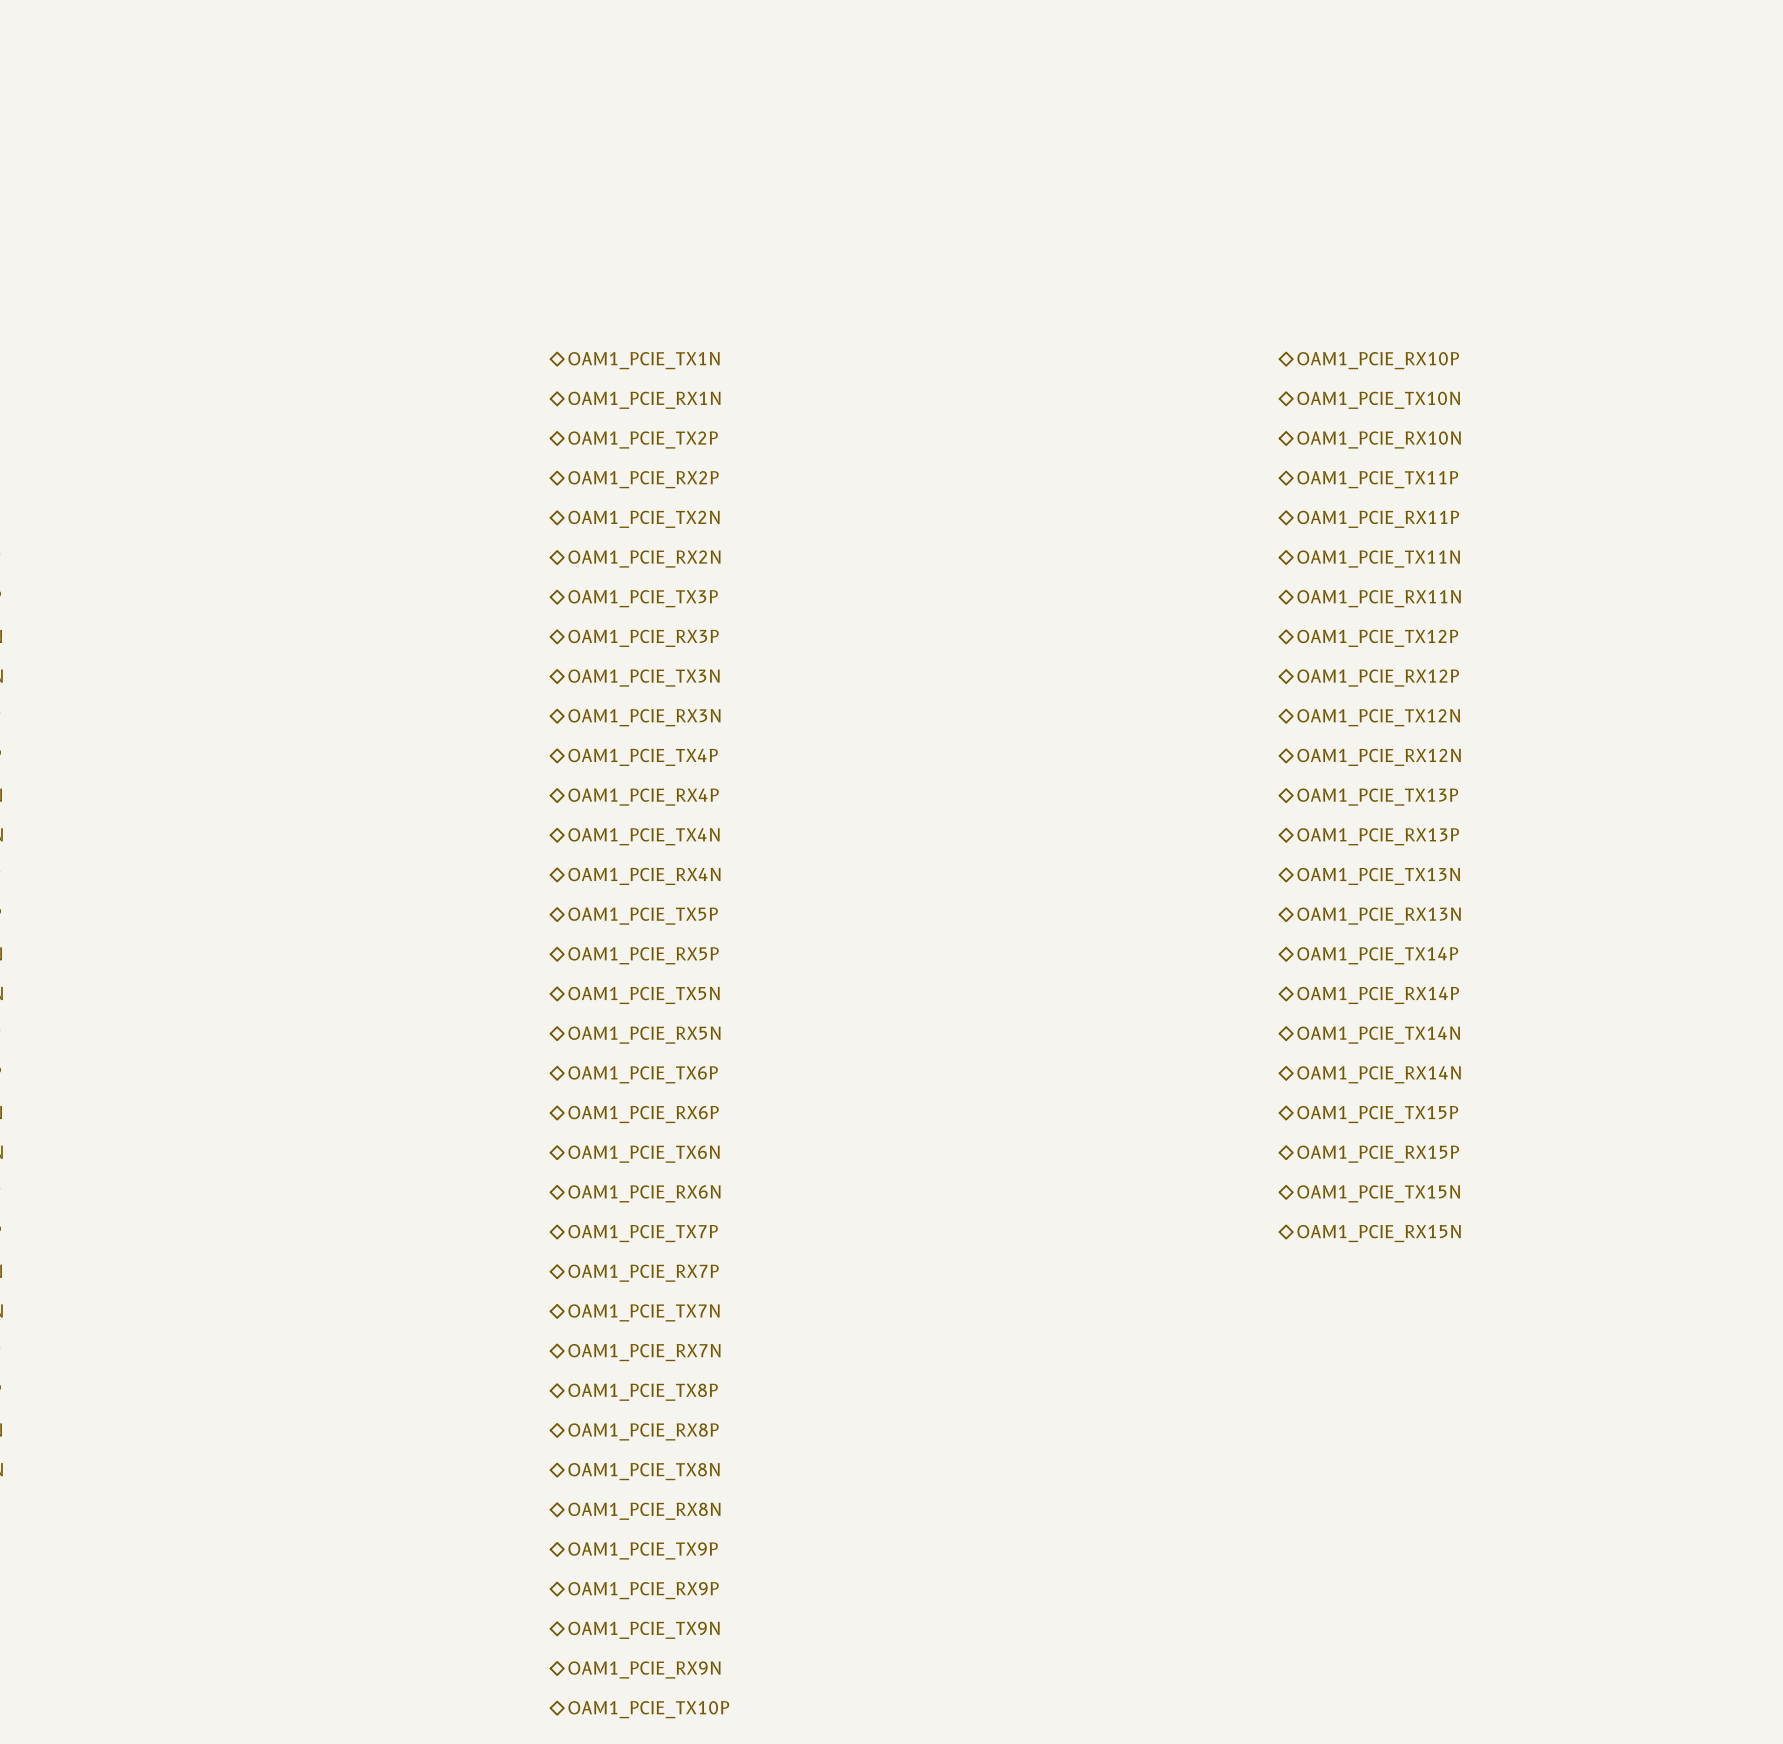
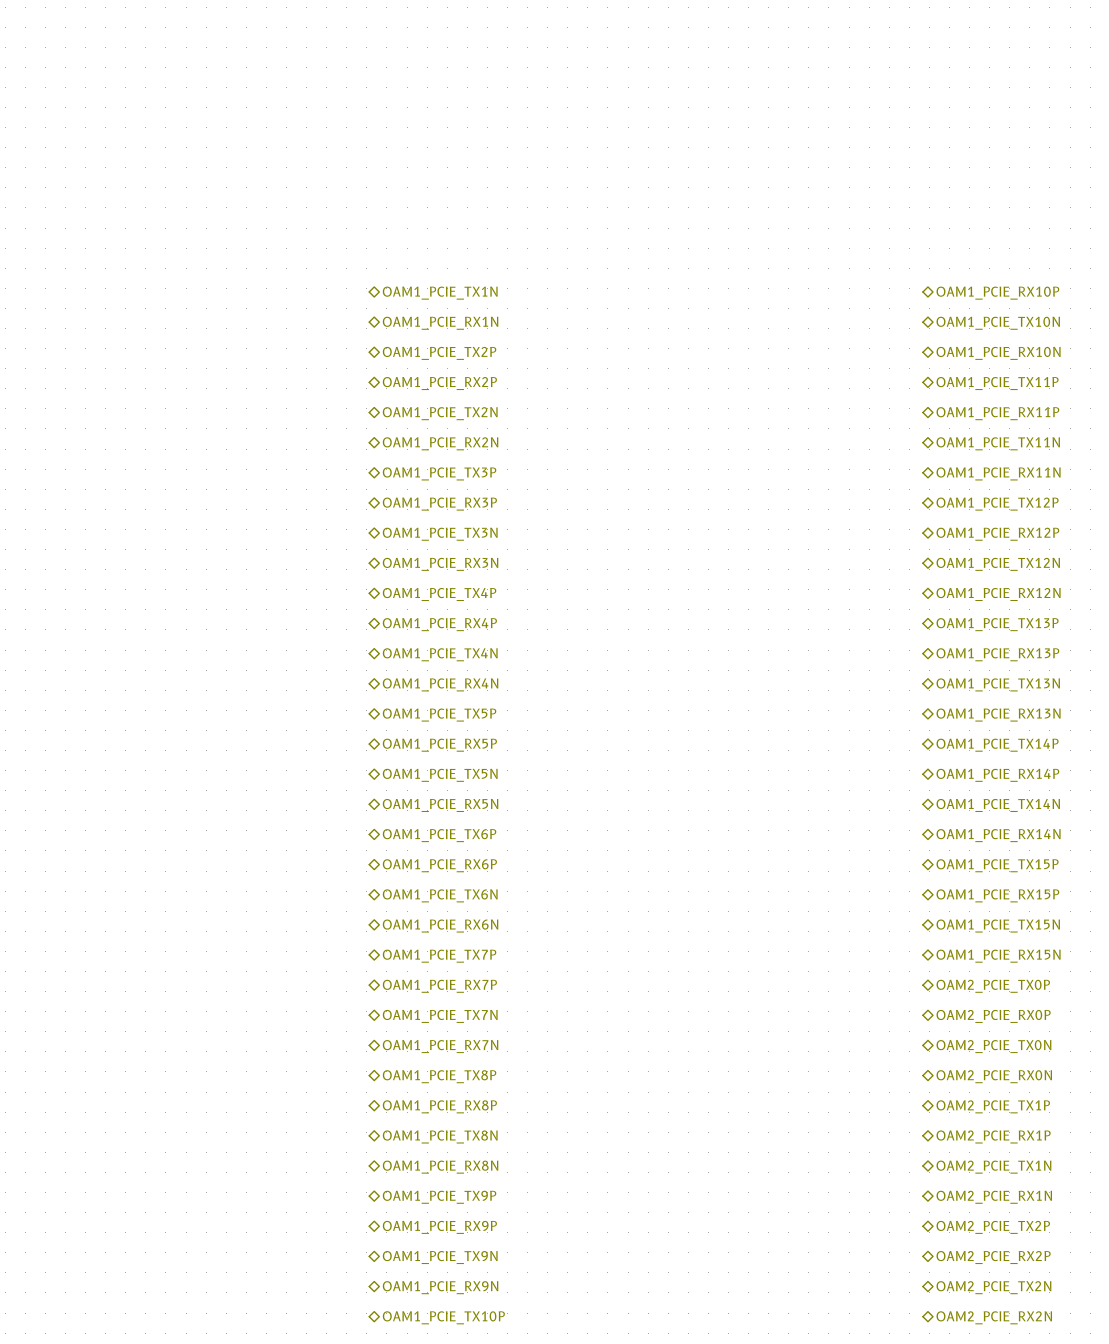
hierarchical label: none -> OAM2_PCIE_TX0P (993, 986)
hierarchical label: none -> OAM2_PCIE_RX0P (993, 1016)
hierarchical label: none -> OAM2_PCIE_TX0N (993, 1046)
hierarchical label: none -> OAM2_PCIE_RX0N (994, 1076)
hierarchical label: none -> OAM2_PCIE_TX1P (993, 1106)
hierarchical label: none -> OAM2_PCIE_RX1P (993, 1136)
hierarchical label: none -> OAM2_PCIE_TX1N (993, 1167)
hierarchical label: none -> OAM2_PCIE_RX1N (994, 1197)
hierarchical label: none -> OAM2_PCIE_TX2P (993, 1227)
hierarchical label: none -> OAM2_PCIE_RX2P (993, 1257)
hierarchical label: none -> OAM2_PCIE_TX2N (993, 1287)
hierarchical label: none -> OAM2_PCIE_RX2N (994, 1317)

